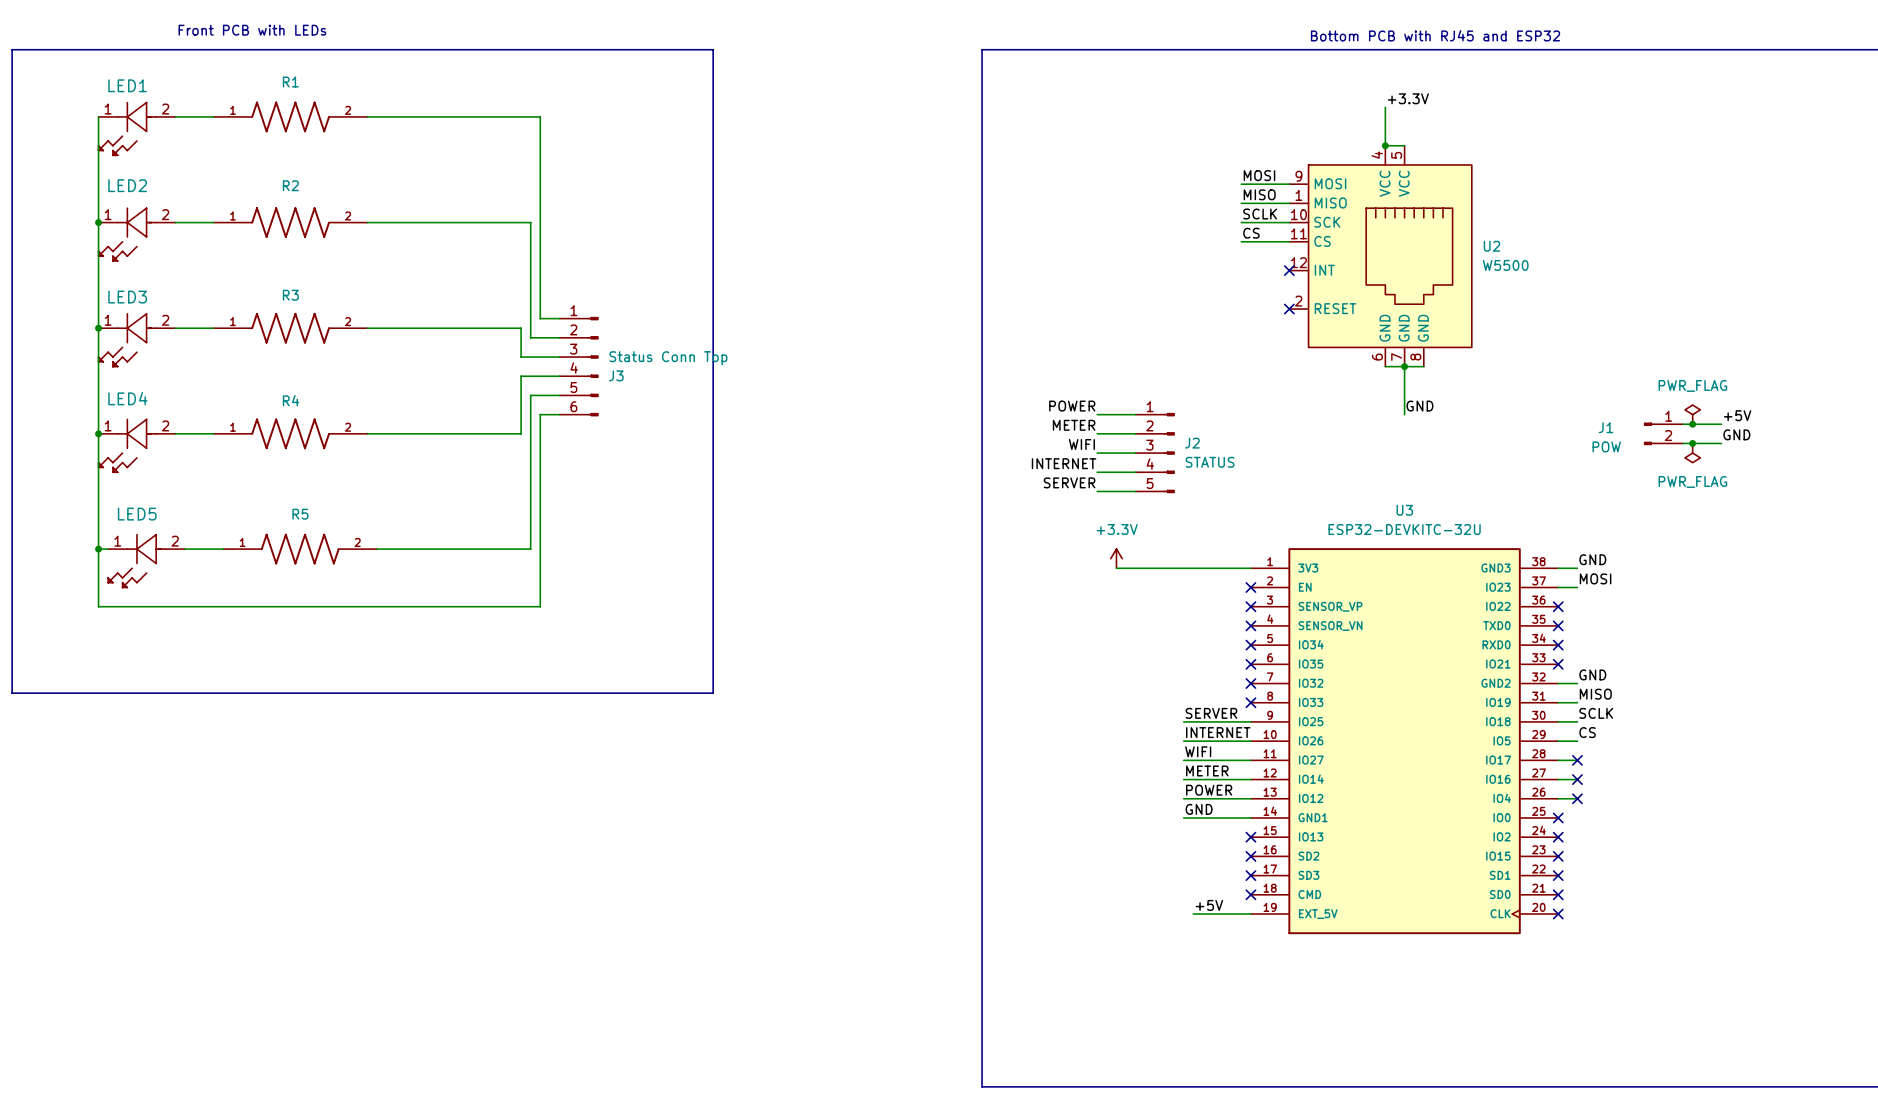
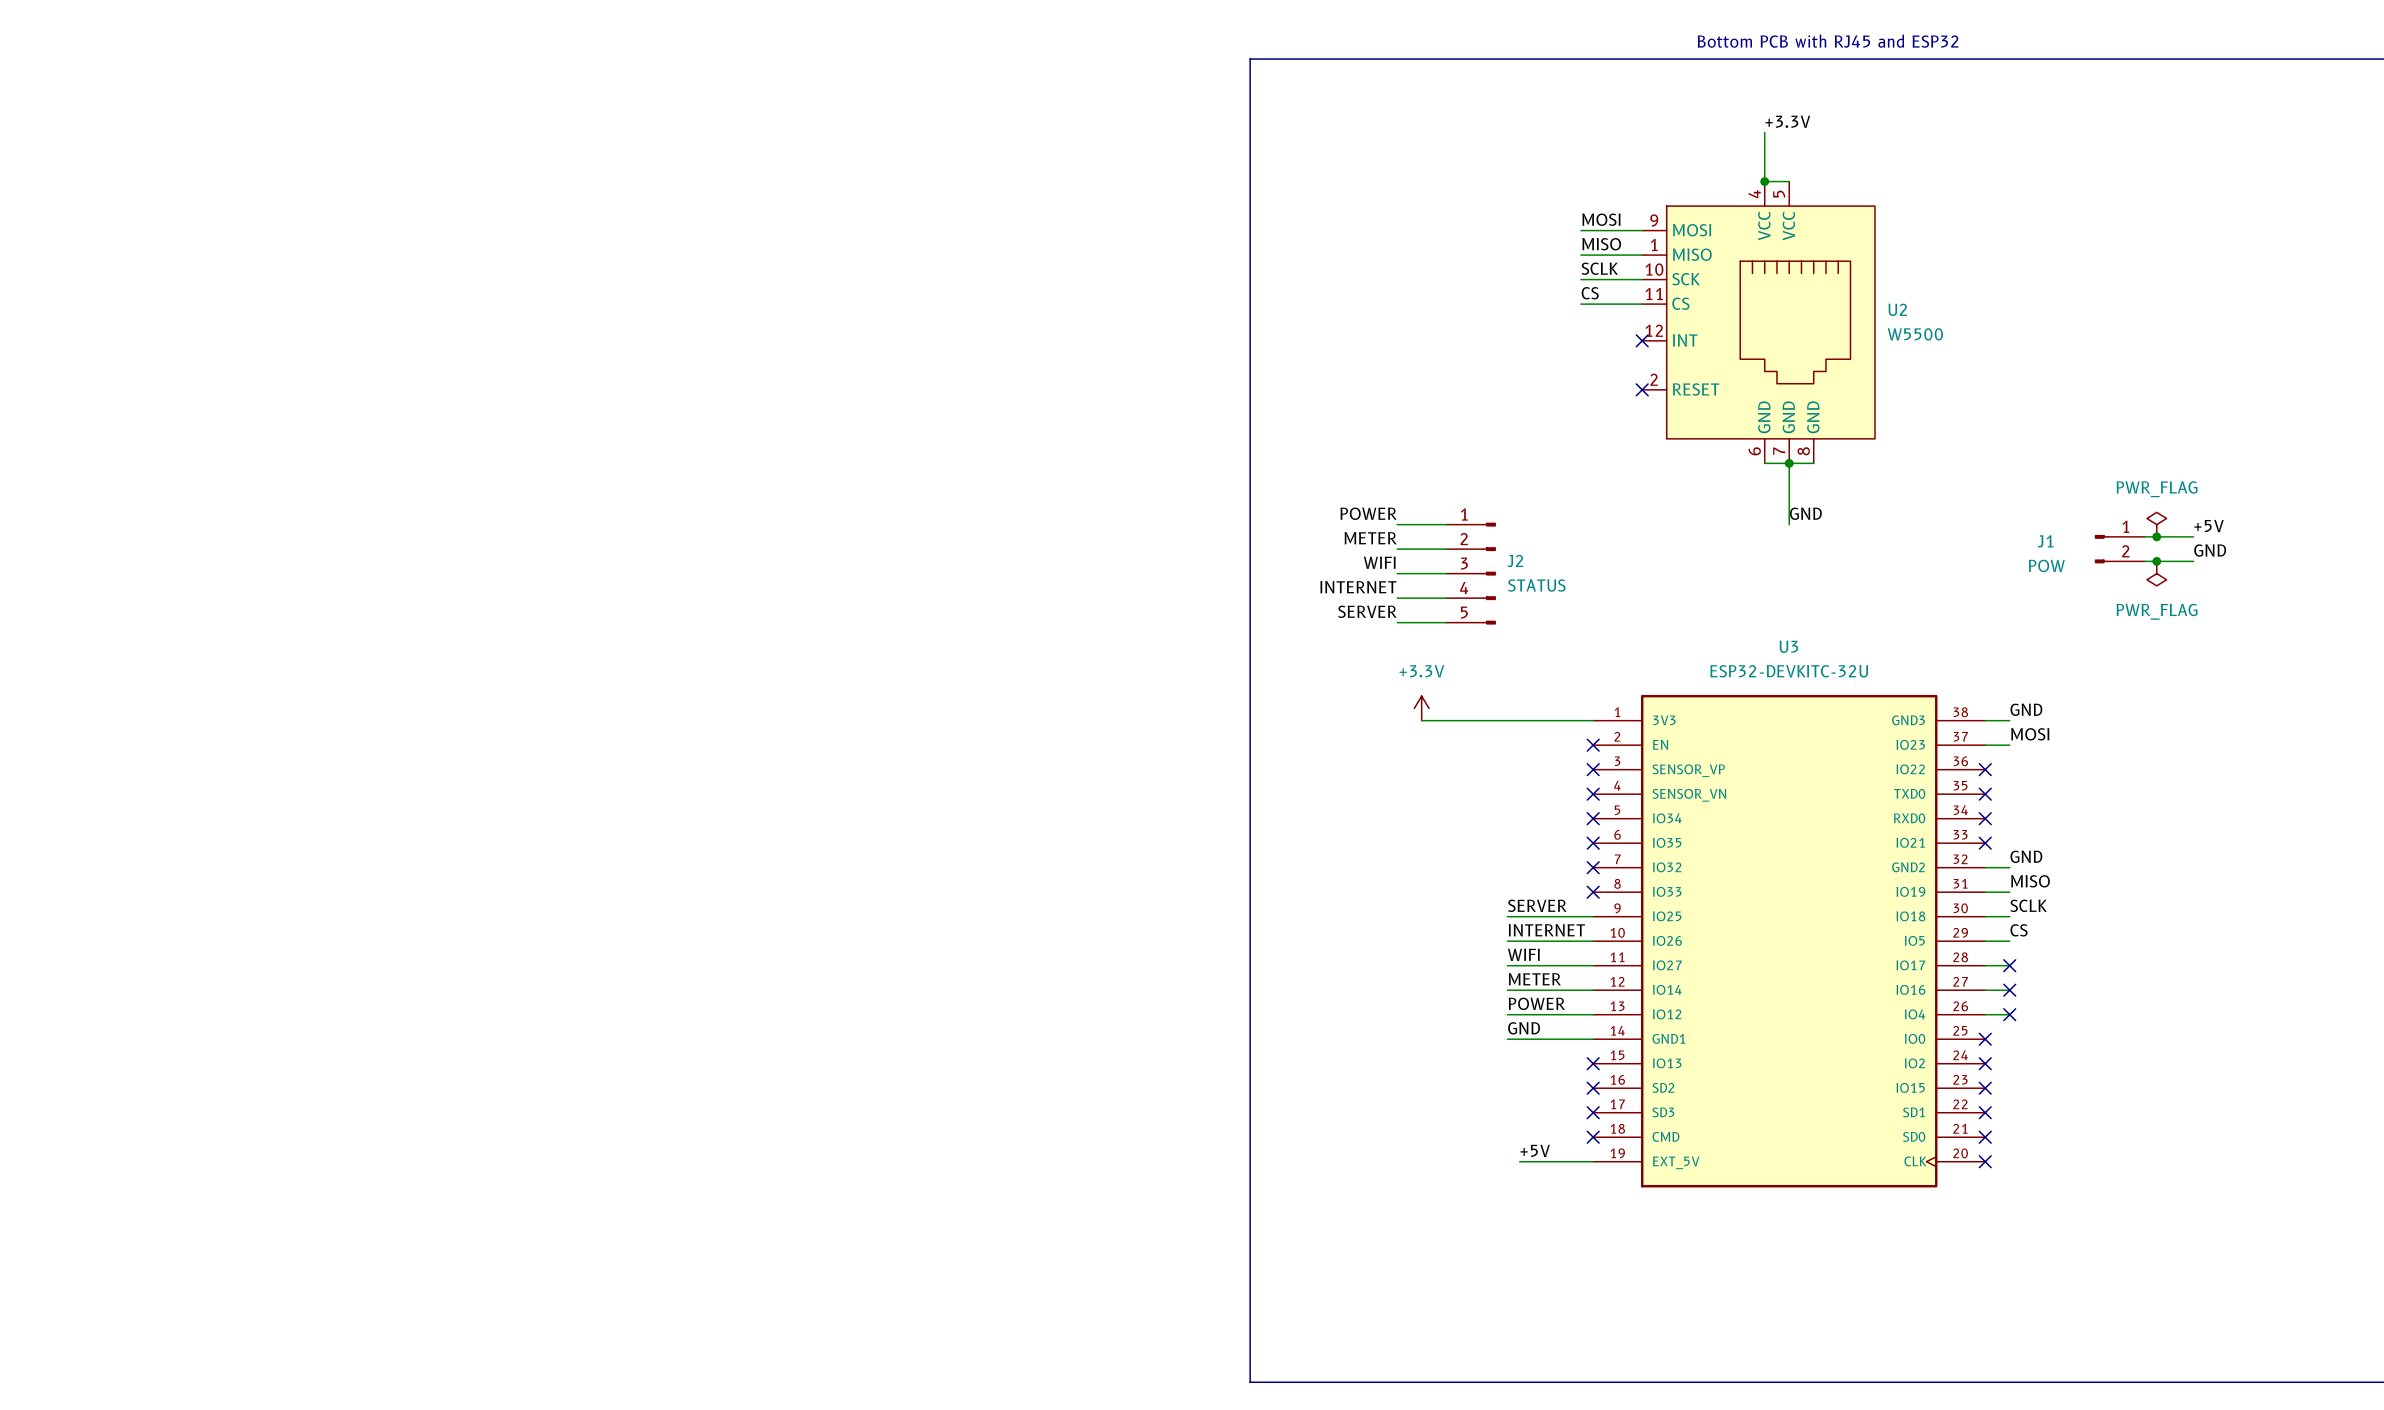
text: Front PCB with LEDs (252, 30) -> none
line: (12, 49) (713, 49) (713, 693) (12, 693) (12, 49) -> none
wire: (98, 116) (98, 606) (540, 606) (540, 414) (559, 414) -> none
wire: (175, 116) (213, 116) -> none
R1: (290, 116) -> none
wire: (367, 116) (540, 116) (540, 318) (559, 318) -> none
LED1: (136, 128) -> none
junction: (98, 222) -> none
wire: (175, 222) (213, 222) -> none
R2: (290, 222) -> none
wire: (367, 222) (530, 222) (530, 337) (559, 337) -> none
LED2: (136, 234) -> none
junction: (98, 328) -> none
wire: (175, 328) (213, 328) -> none
R3: (290, 328) -> none
wire: (367, 328) (521, 328) (521, 357) (559, 357) -> none
LED3: (136, 340) -> none
J3: Status Conn Top (578, 366) -> none
wire: (559, 376) (521, 376) (521, 433) (367, 433) -> none
wire: (559, 395) (530, 395) (530, 549) (377, 549) -> none
junction: (98, 433) -> none
wire: (175, 433) (213, 433) -> none
R4: (290, 433) -> none
LED4: (136, 445) -> none
wire: (98, 549) (108, 549) -> none
junction: (98, 549) -> none
wire: (184, 549) (223, 549) -> none
R5: (300, 549) -> none
LED5: (146, 561) -> none

